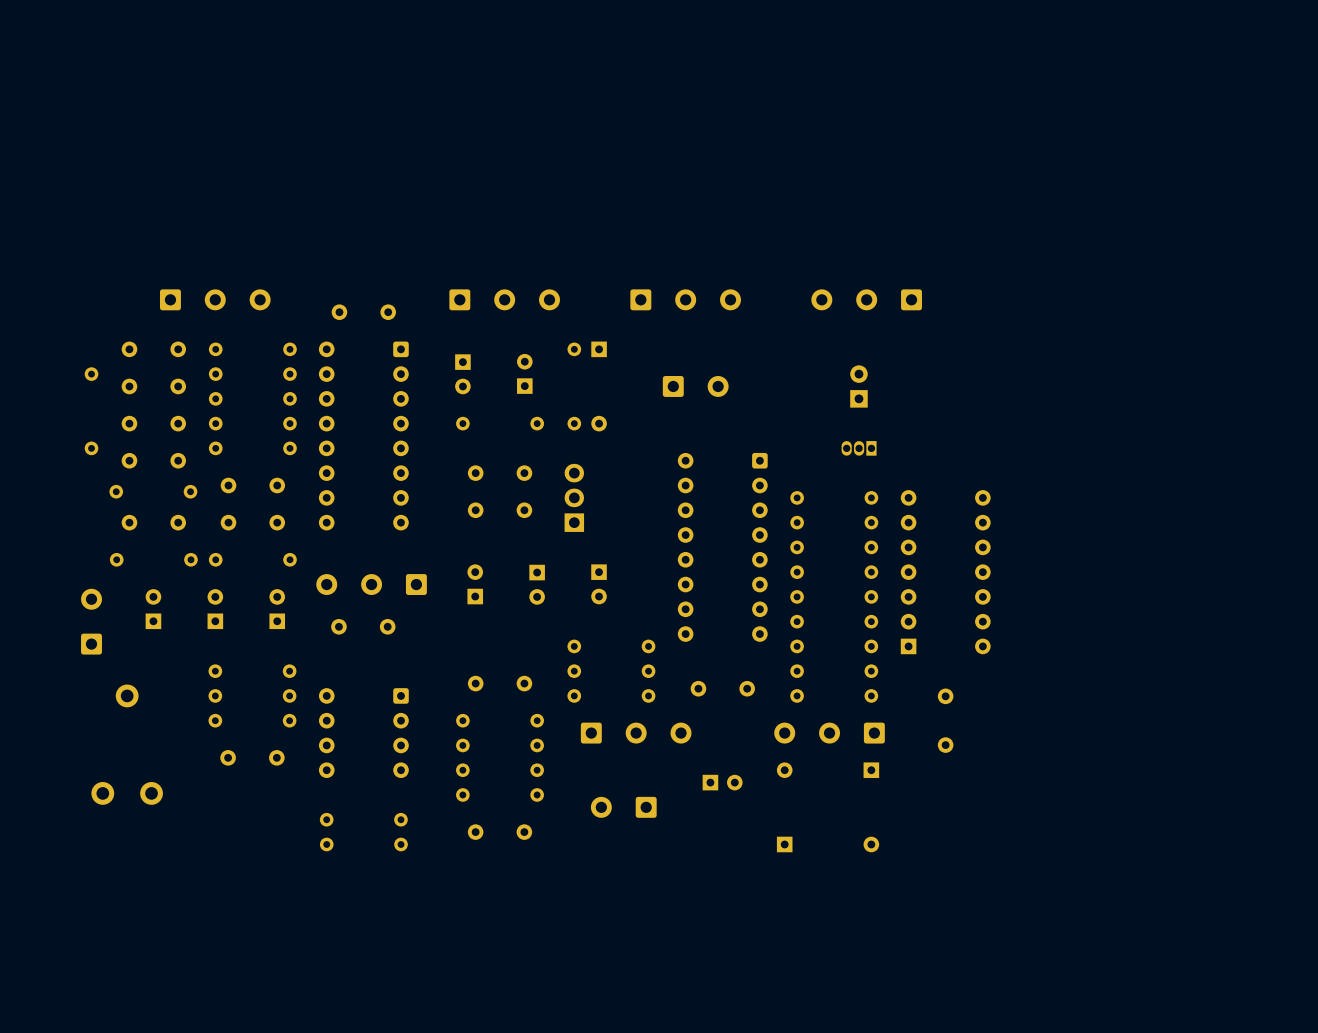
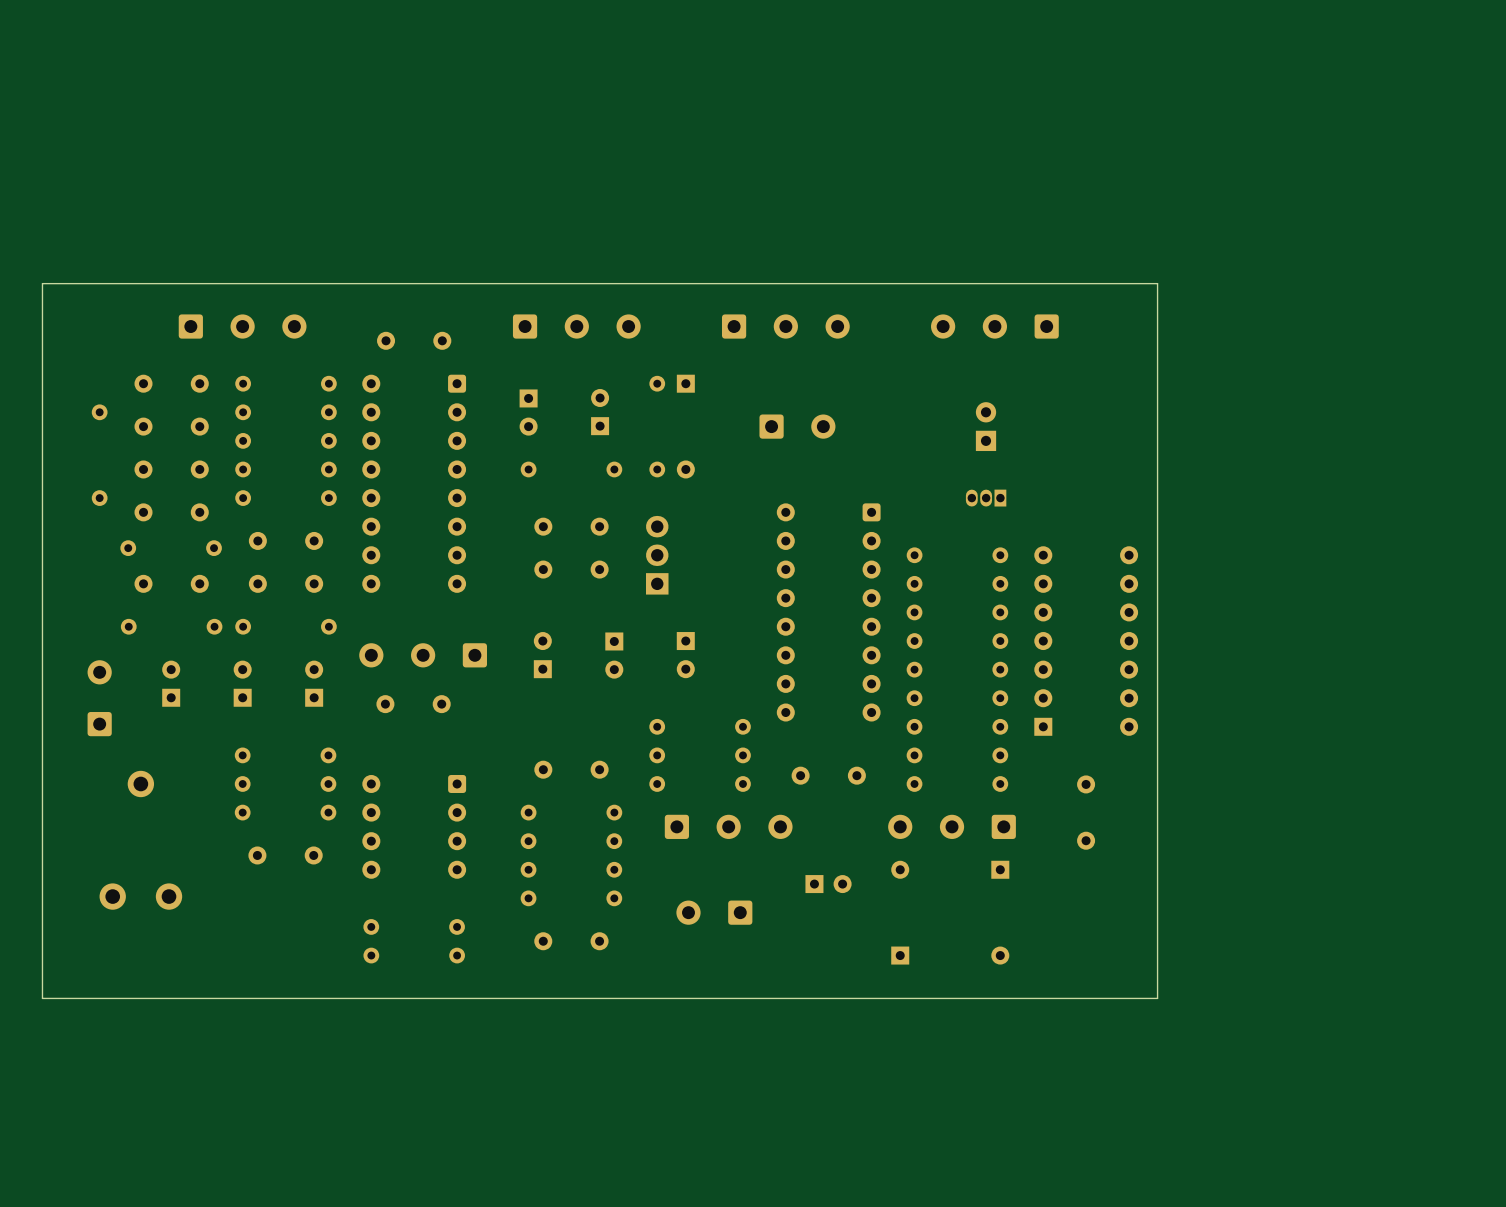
board edge: none -> (1157, 283) (1157, 998) (42, 998) (42, 283) (1157, 283)

